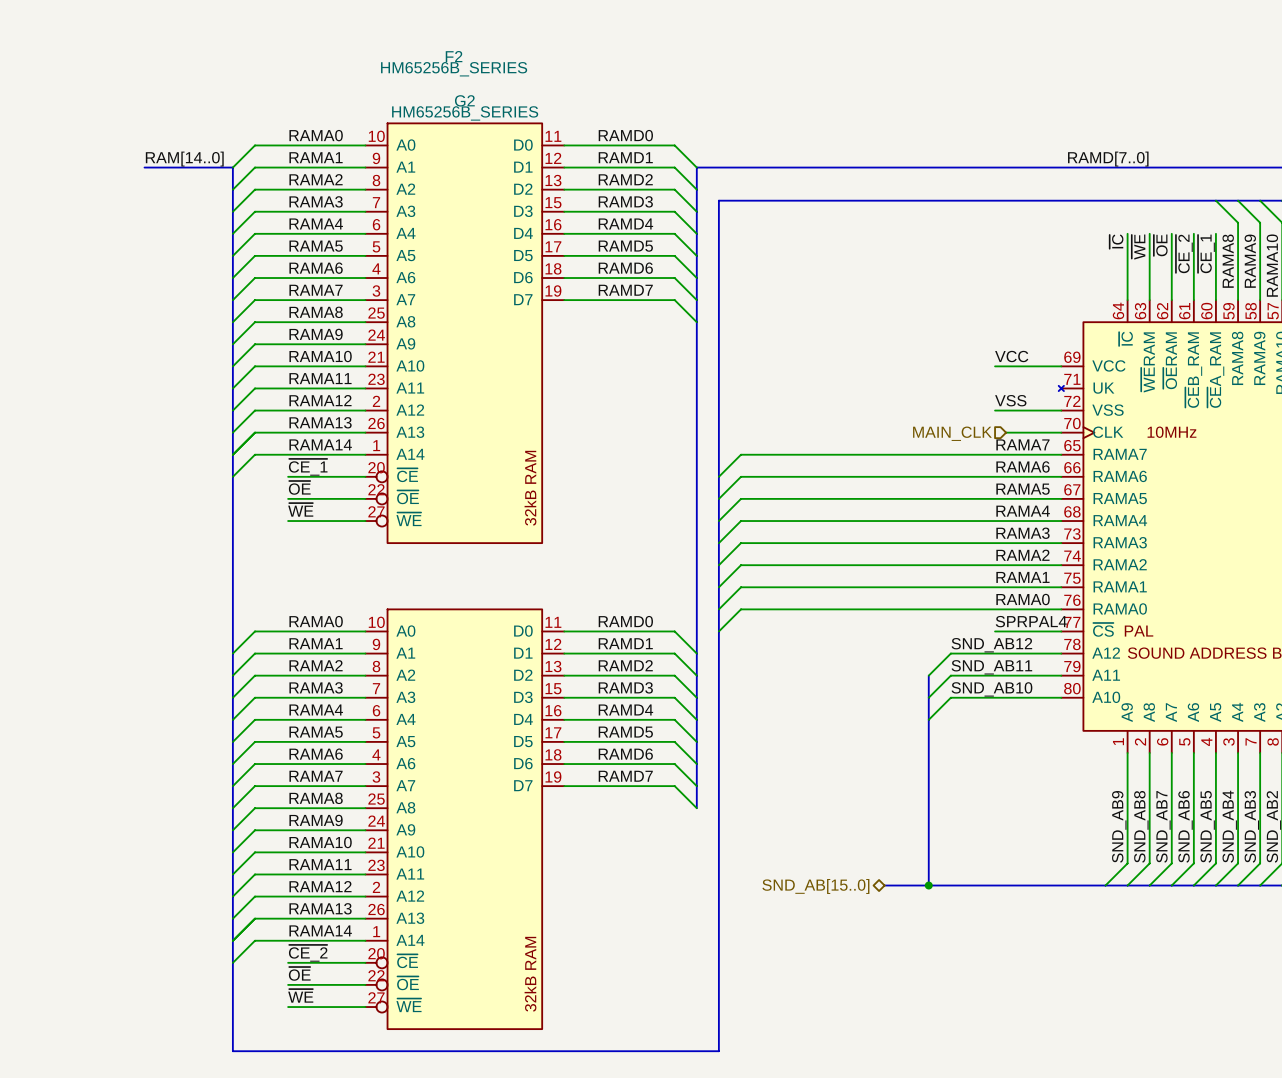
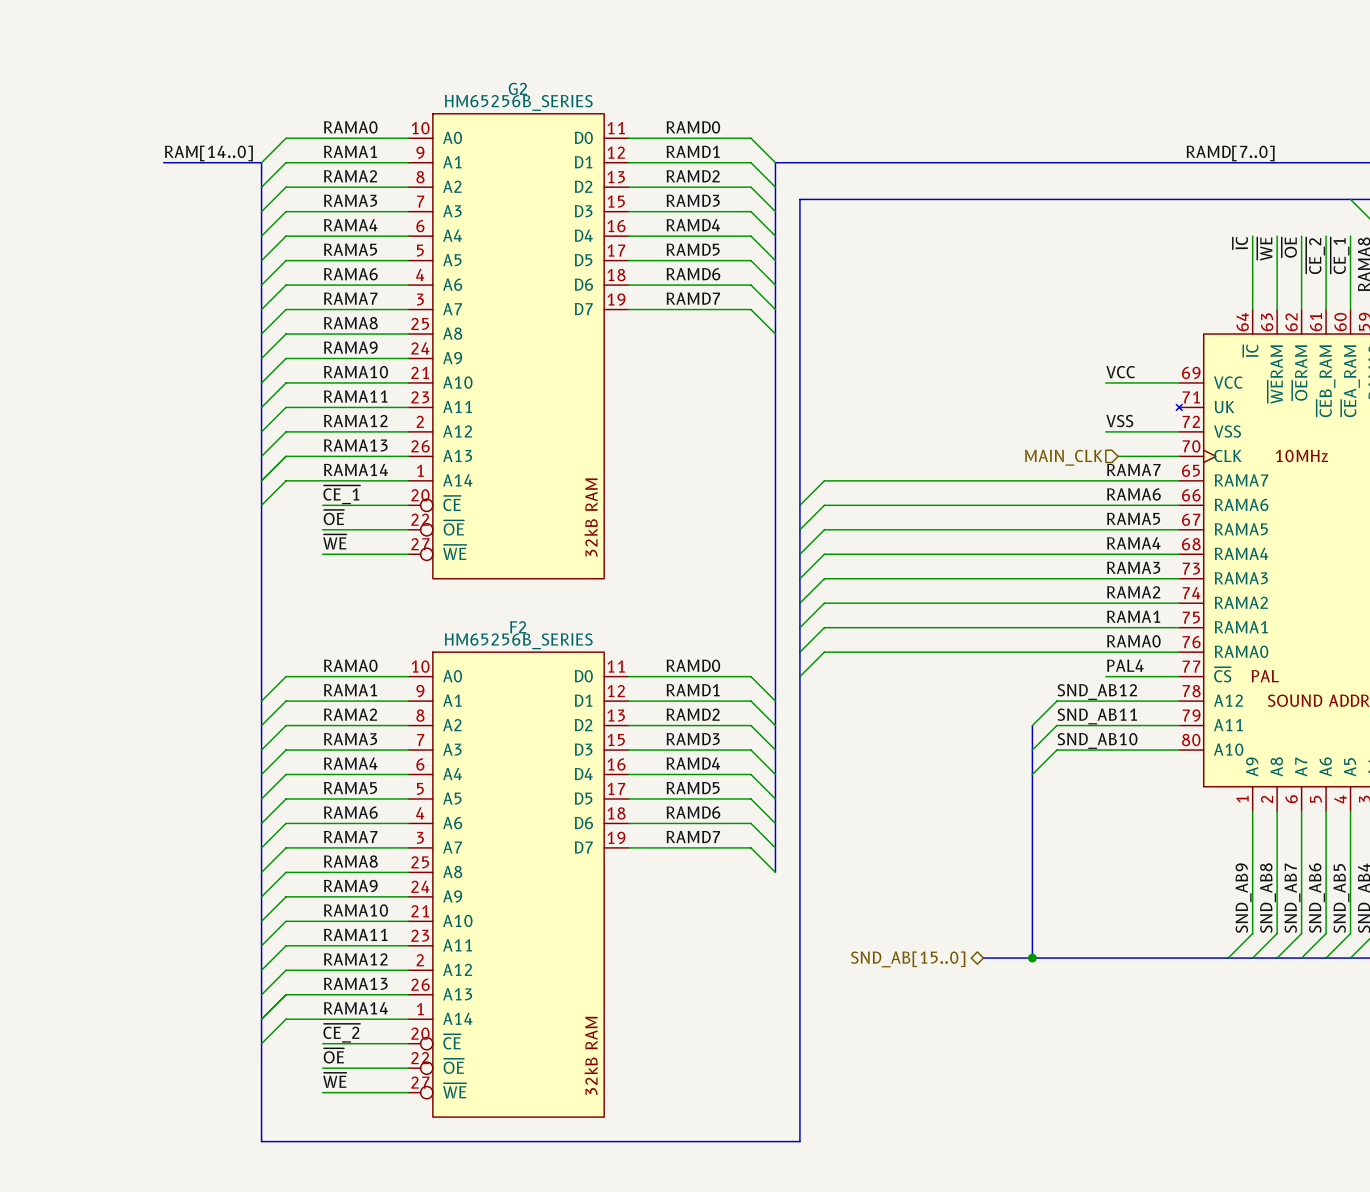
F2 name position: F2 (454, 56) -> F2 (518, 627)
F2 value position: HM65256B_SERIES (454, 69) -> HM65256B_SERIES (518, 641)
label: SPRPAL4 (1031, 621) -> PAL4 (1125, 665)

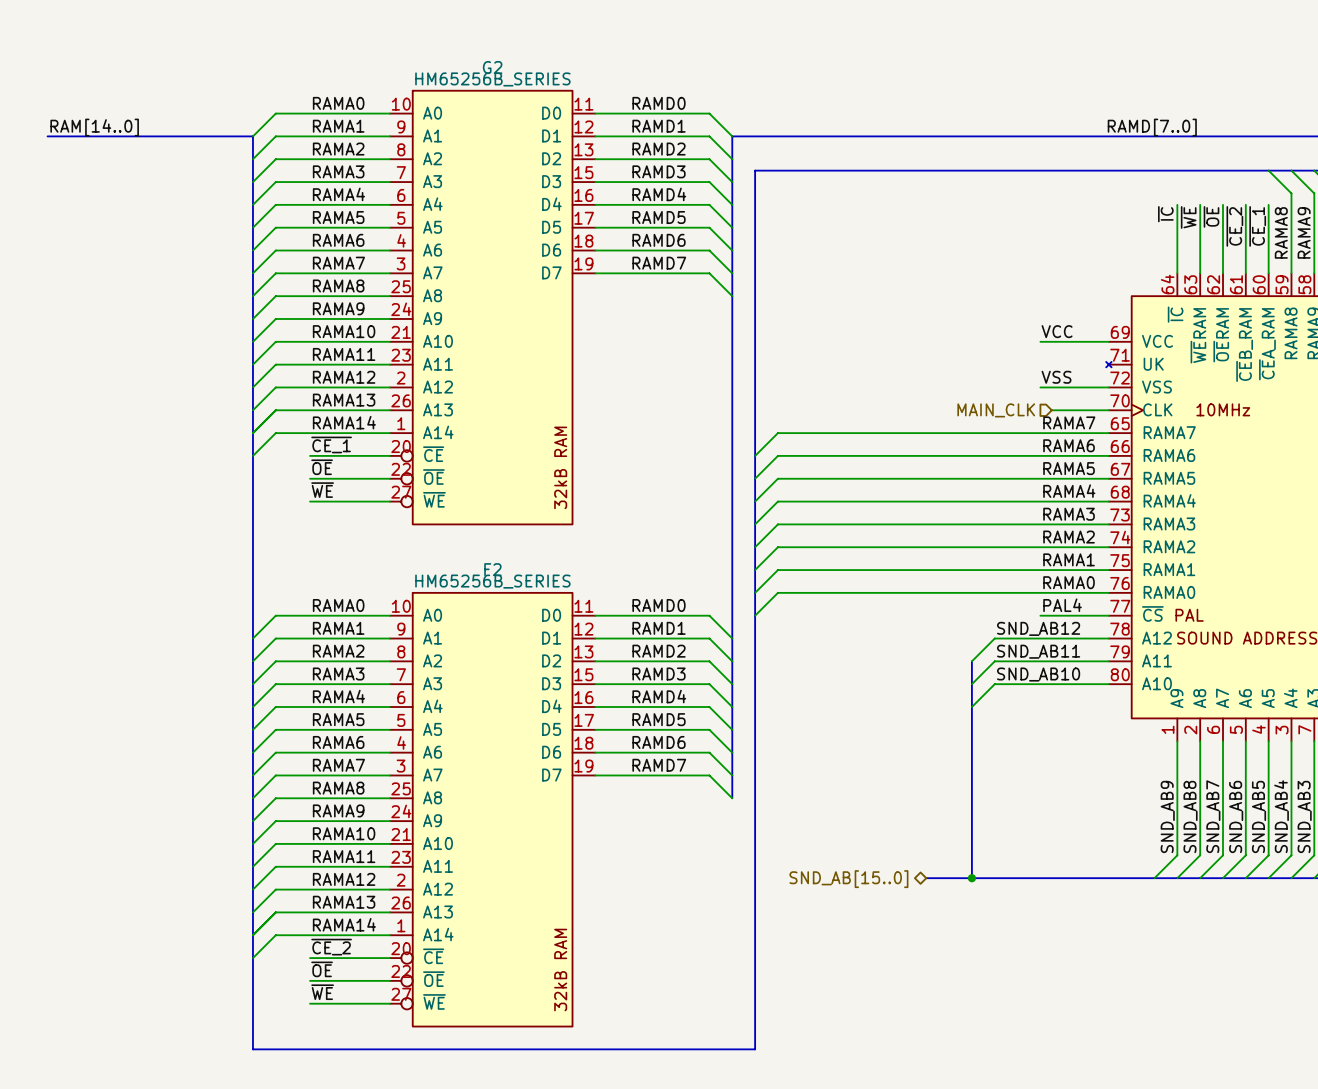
label position: RAM[14..0] (208, 153) -> RAM[14..0] (94, 127)
bus: none -> (47, 136) (161, 136)

